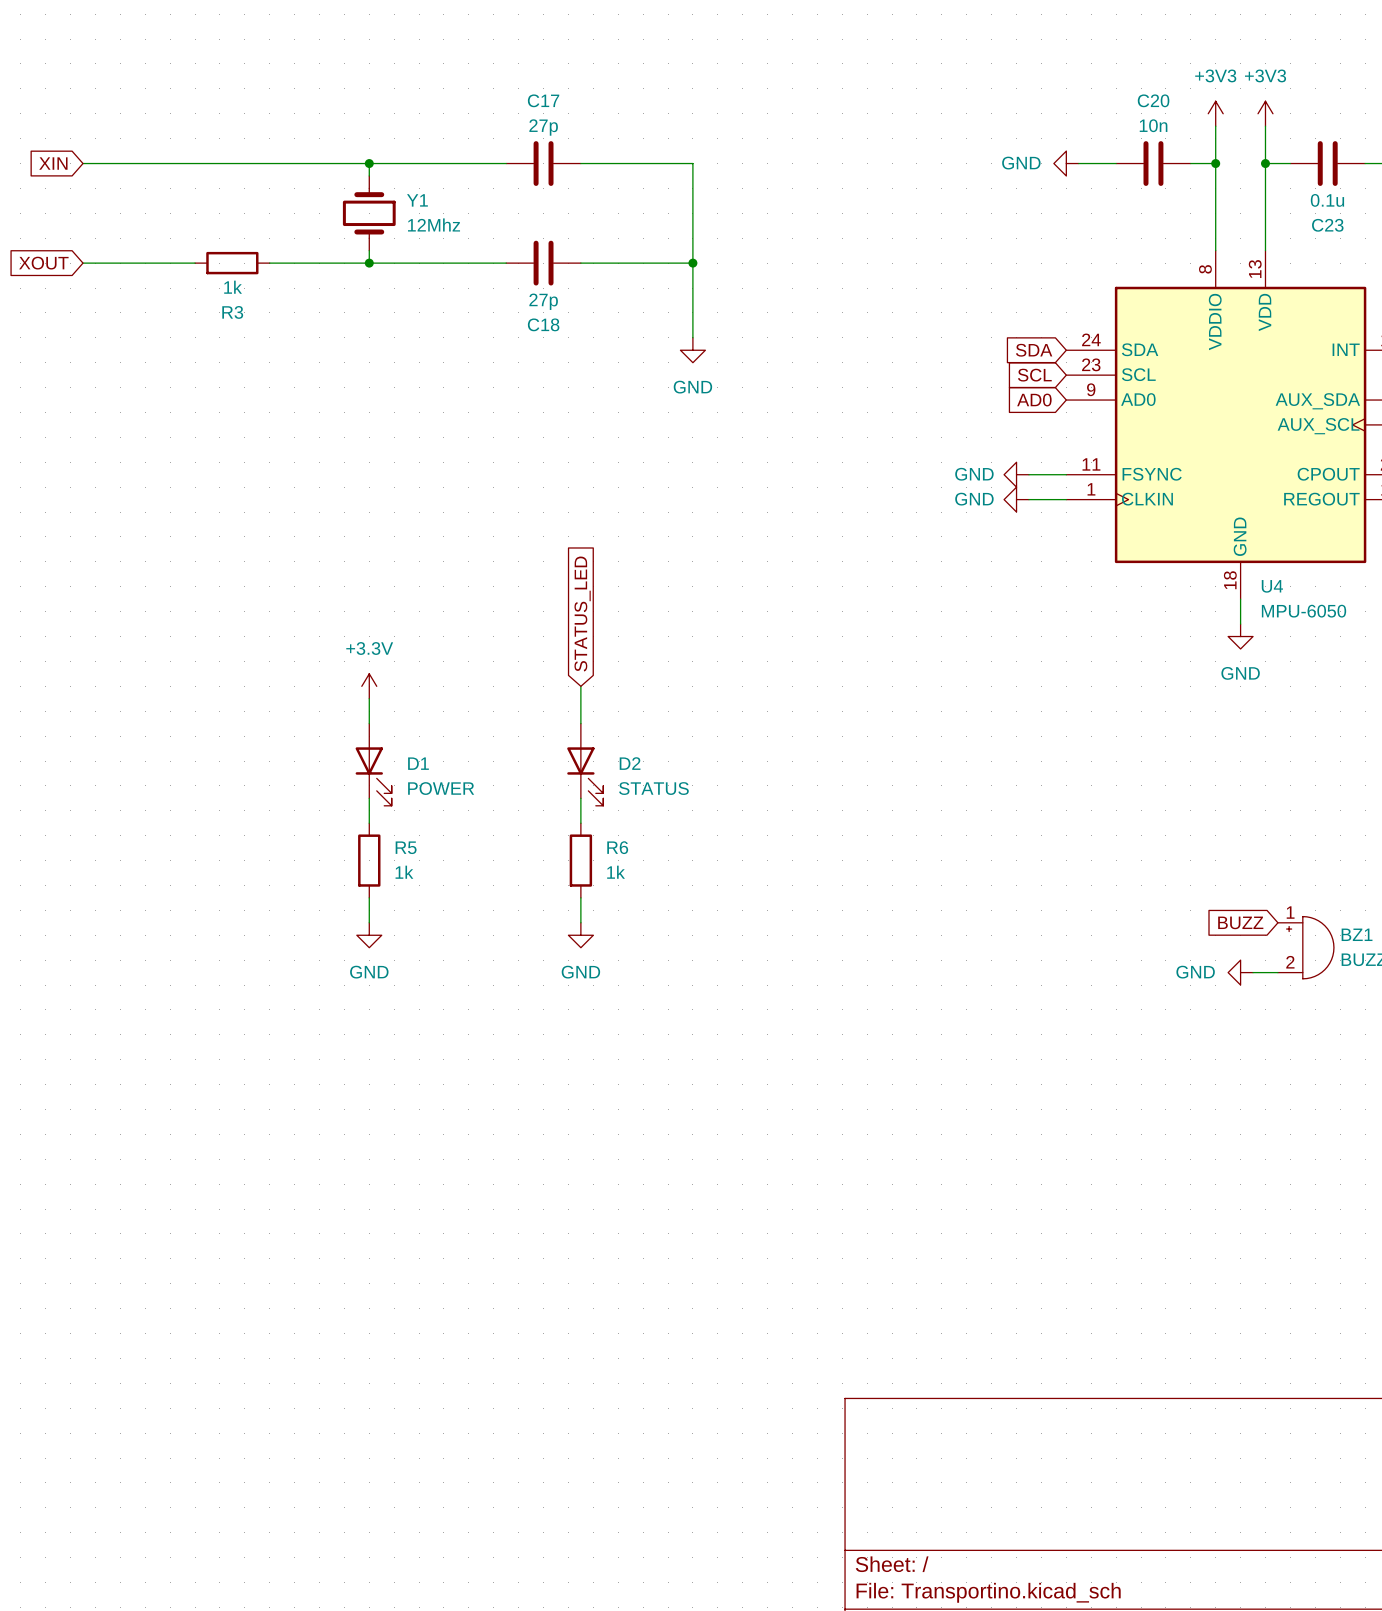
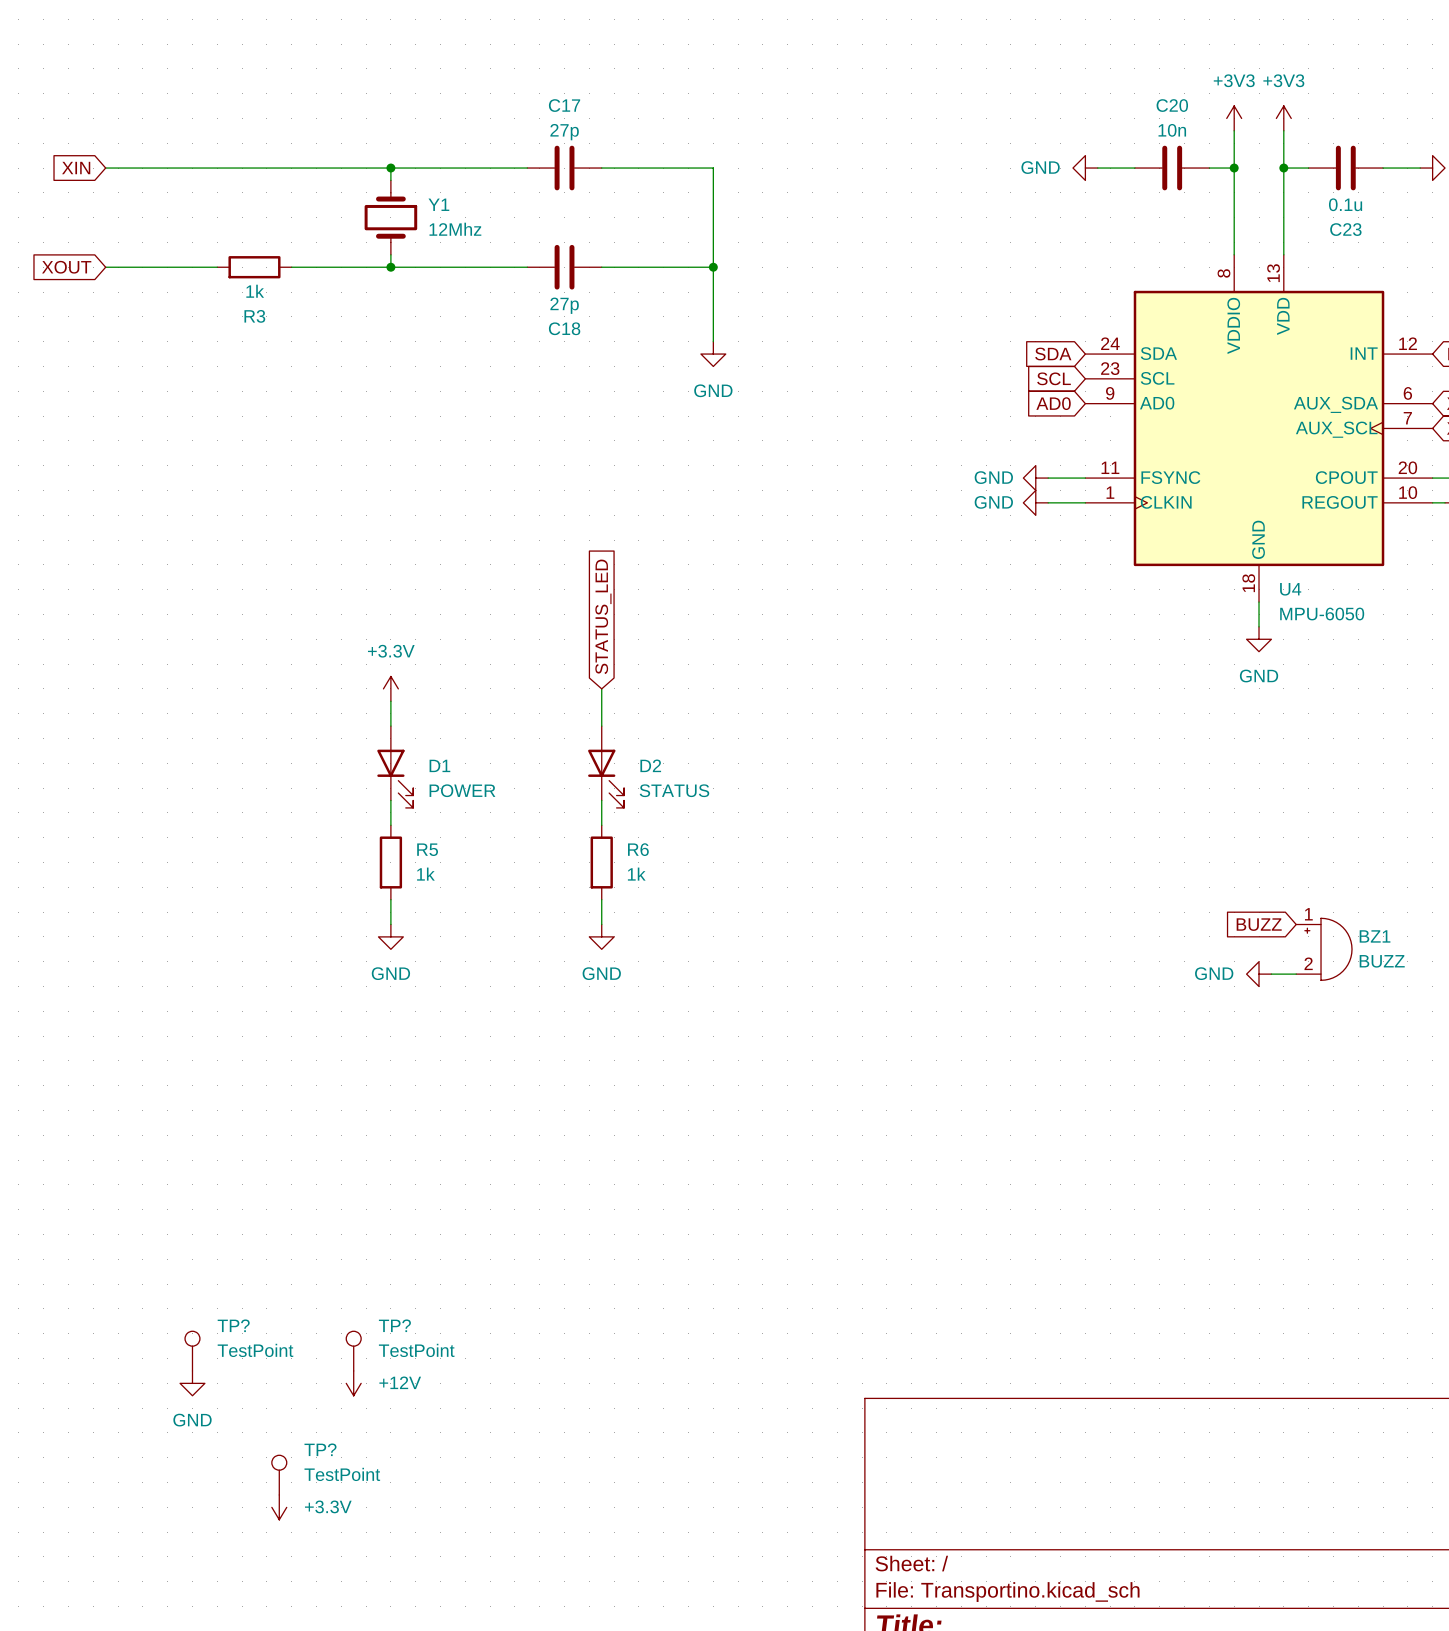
TP?: none -> TestPoint (192, 1351)
TP?: none -> TestPoint (353, 1351)
power symbol: none -> GND (192, 1383)
power symbol: none -> +12V (353, 1383)
TP?: none -> TestPoint (279, 1475)
power symbol: none -> +3.3V (279, 1507)

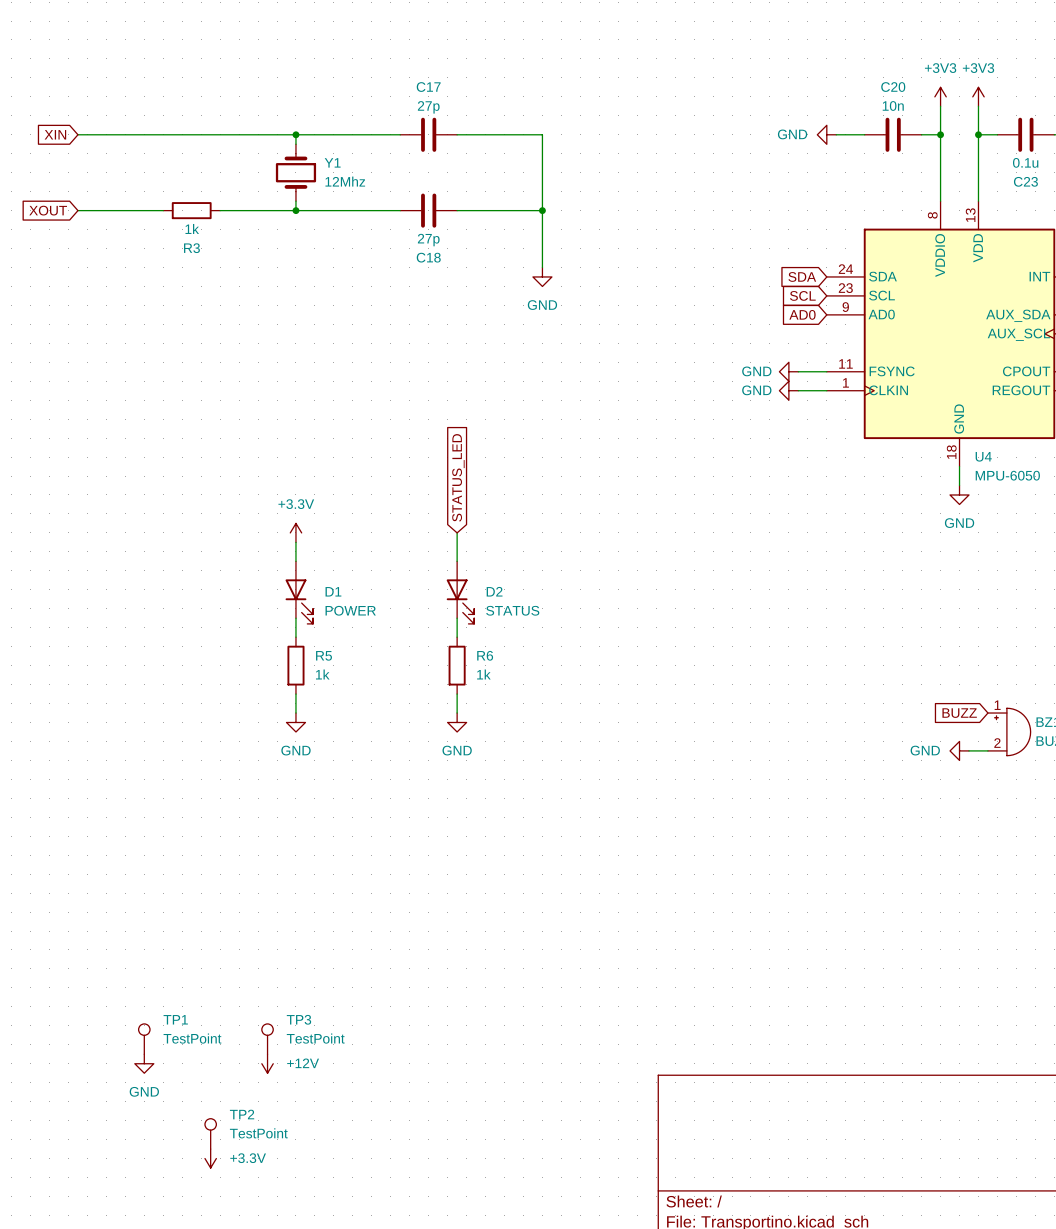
TP? name: TP? (233, 1325) -> TP1 (175, 1019)
TP? name: TP? (394, 1325) -> TP3 (298, 1019)
TP? name: TP? (320, 1449) -> TP2 (242, 1114)

